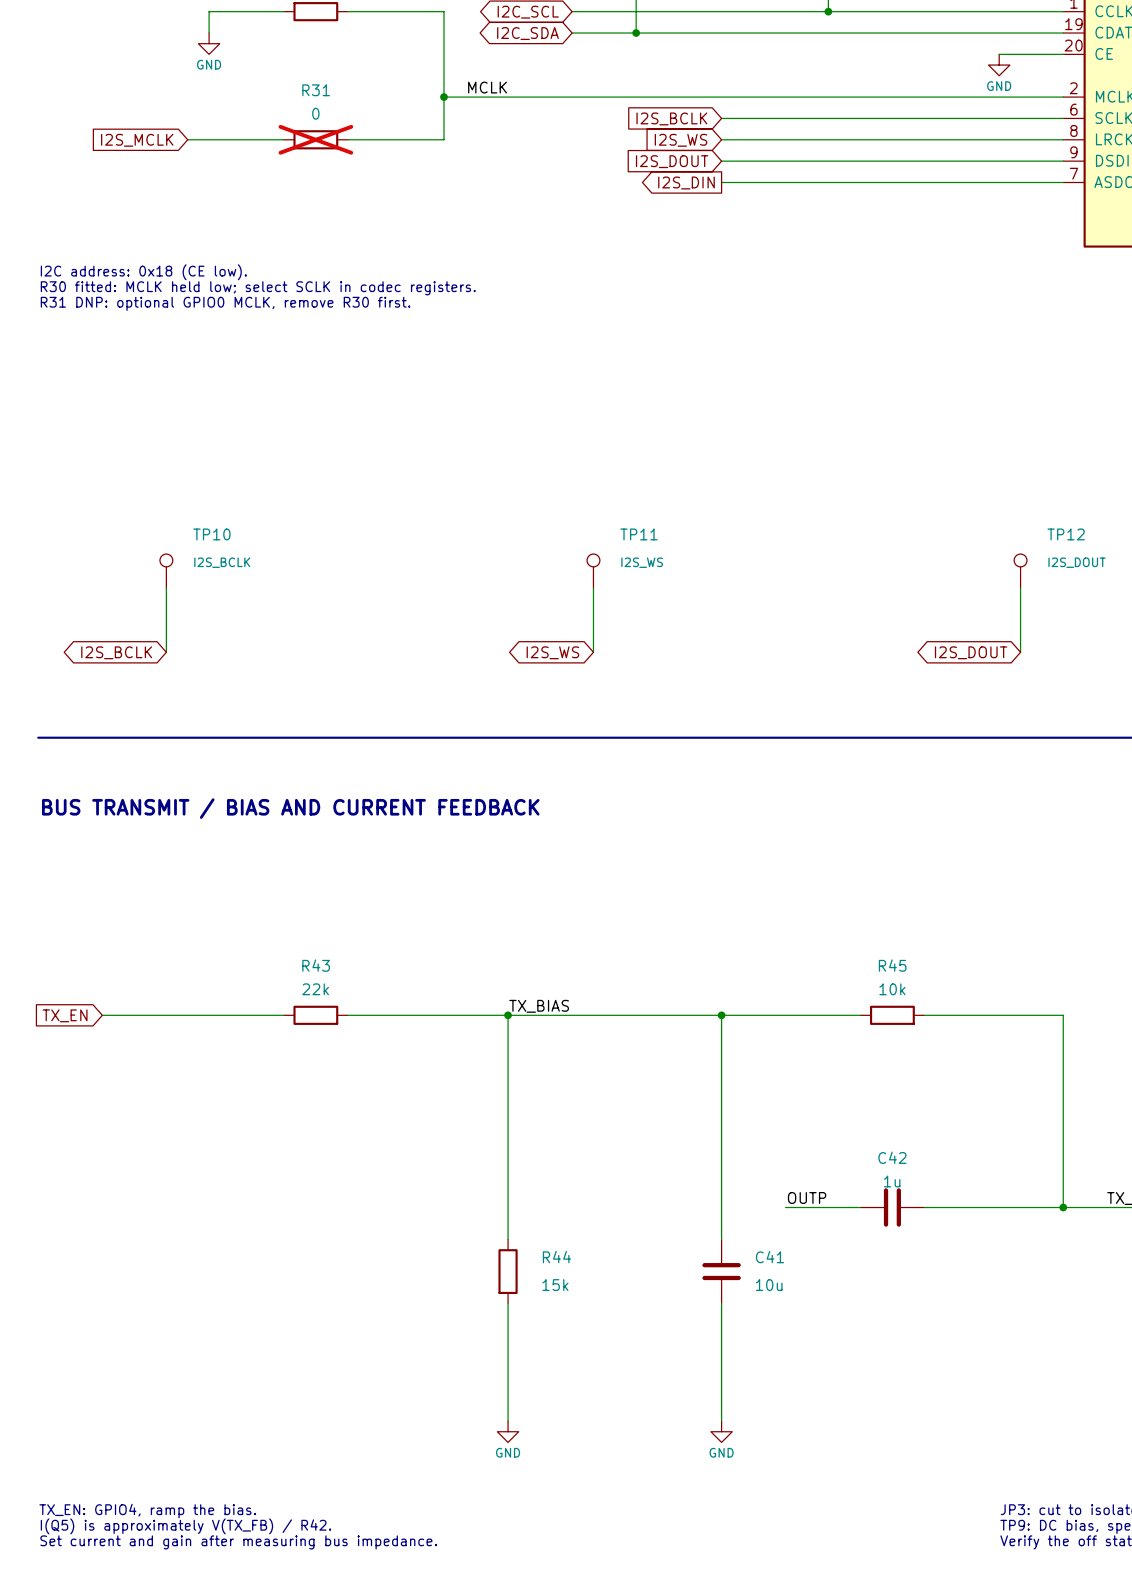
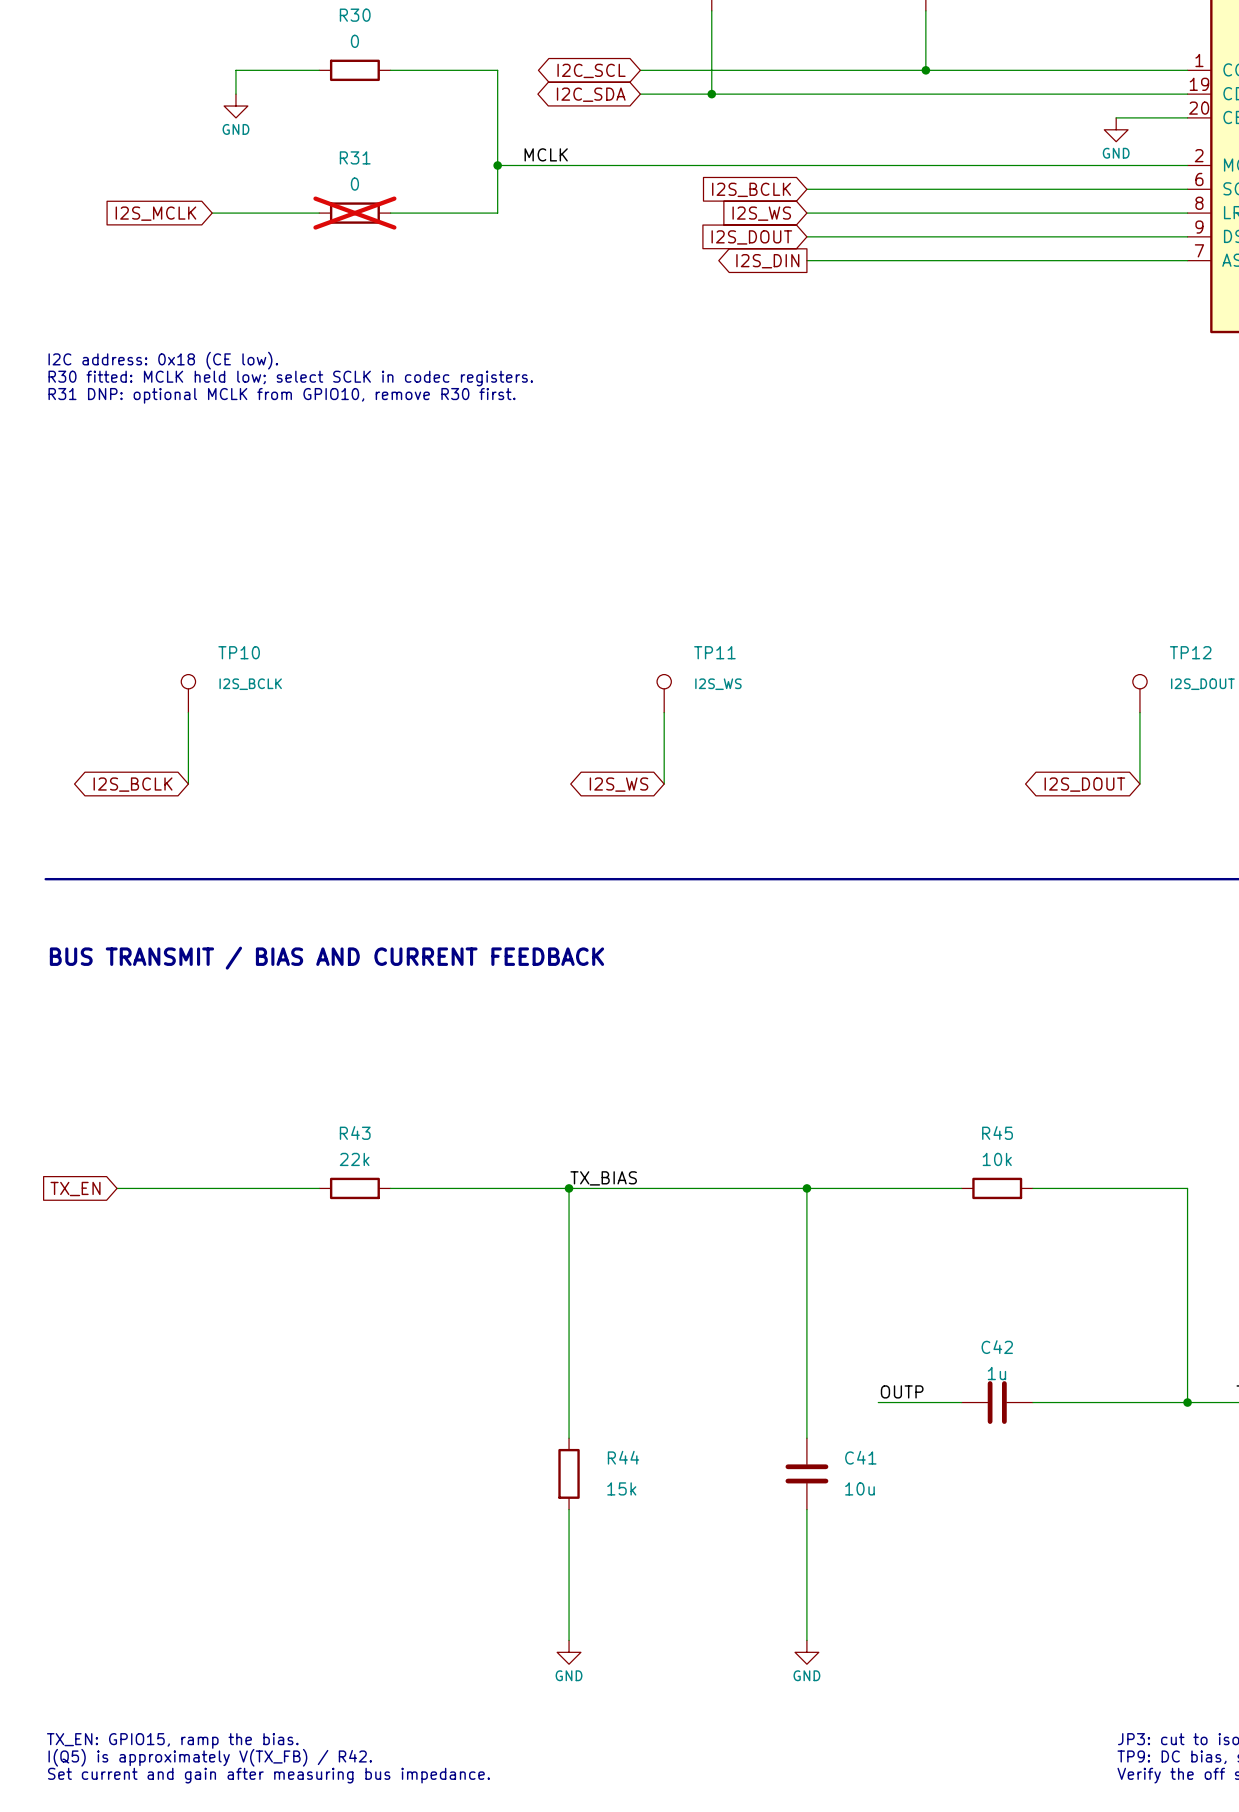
text: R31 DNP: optional GPIO0 MCLK, remove R30 first. (225, 303) -> R31 DNP: optional MCLK from GPIO10, remove R30 first. (282, 395)
text: TX_EN: GPIO4, ramp the bias. (147, 1511) -> TX_EN: GPIO15, ramp the bias. (172, 1740)

